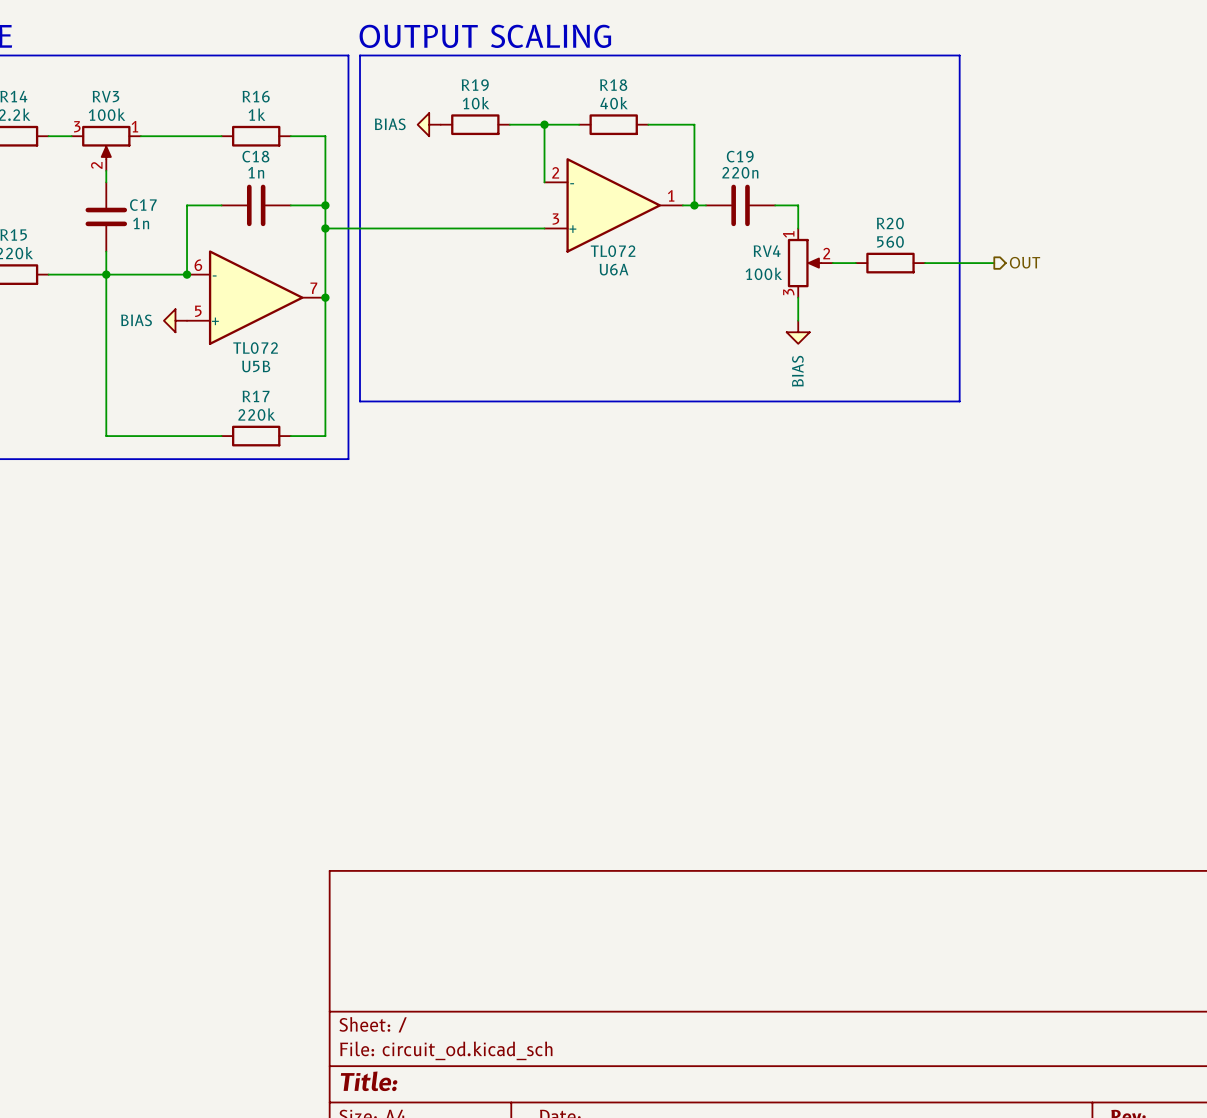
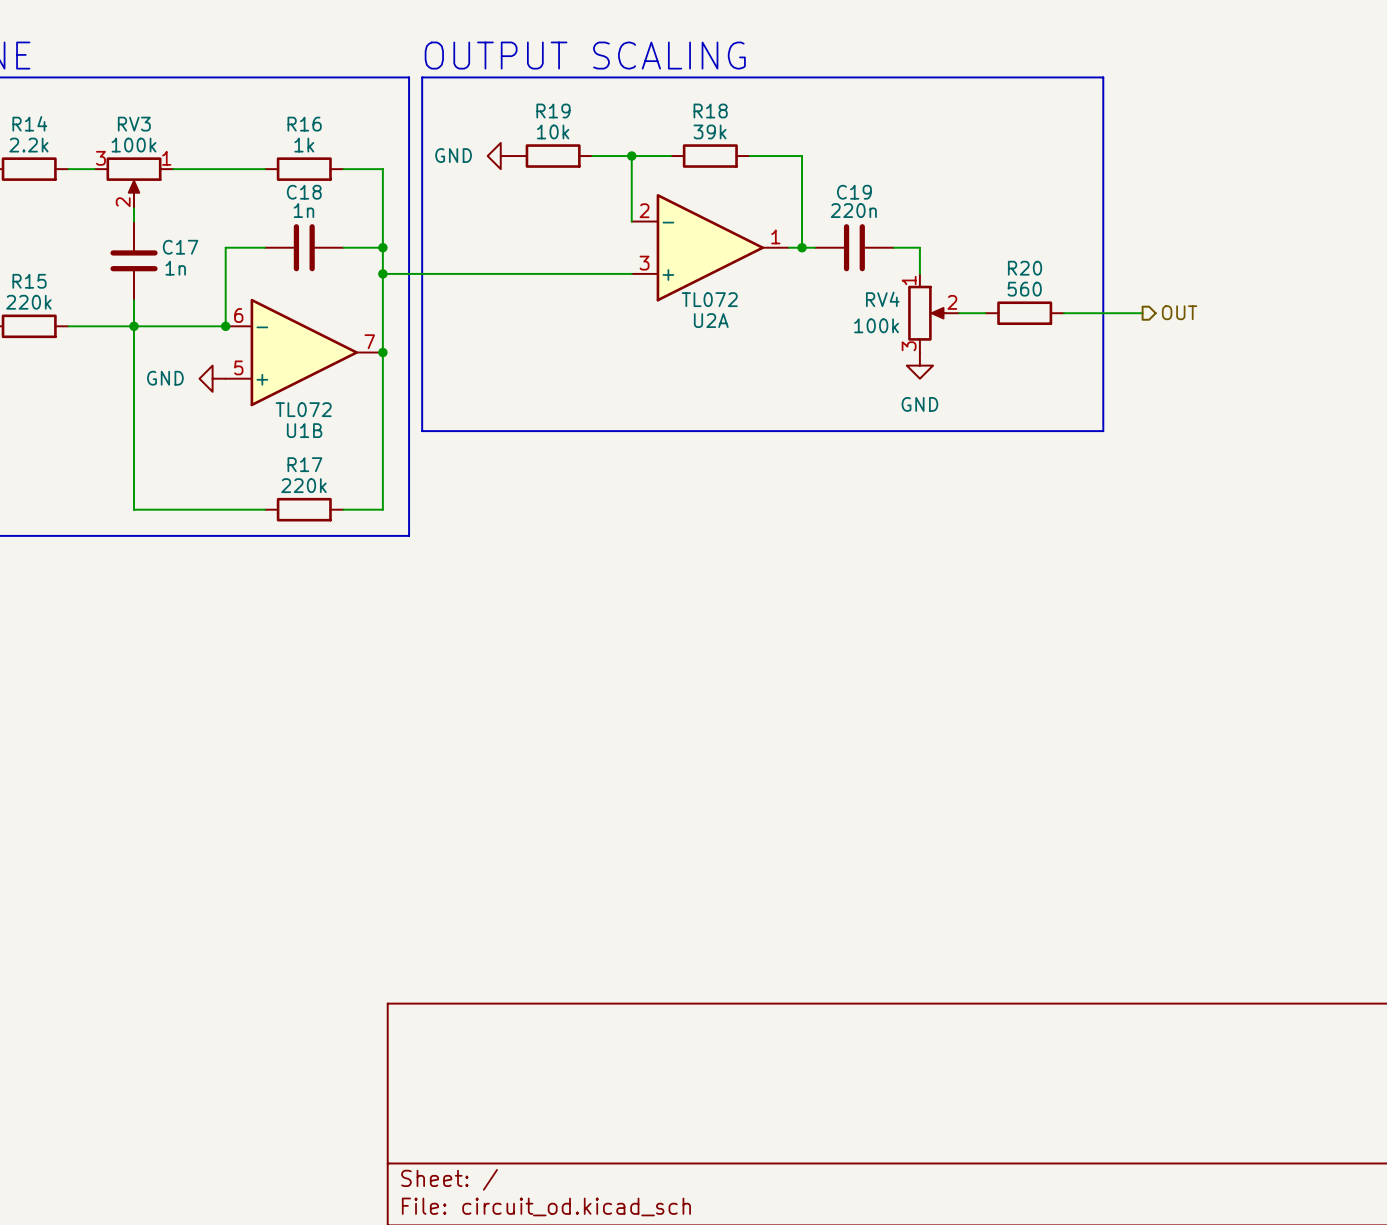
R18 value: 40k (614, 103) -> 39k (710, 131)
power symbol: BIAS (429, 124) -> GND (500, 156)
U6A name: U6A (614, 269) -> U2A (711, 320)
power symbol: none -> GND (919, 365)
power symbol: BIAS (175, 320) -> GND (212, 378)
power symbol: BIAS (798, 332) -> none
U5B name: U5B (256, 366) -> U1B (304, 430)
line: (360, 366) (360, 401) (959, 401) (959, 366) -> (422, 431) (1103, 431)

